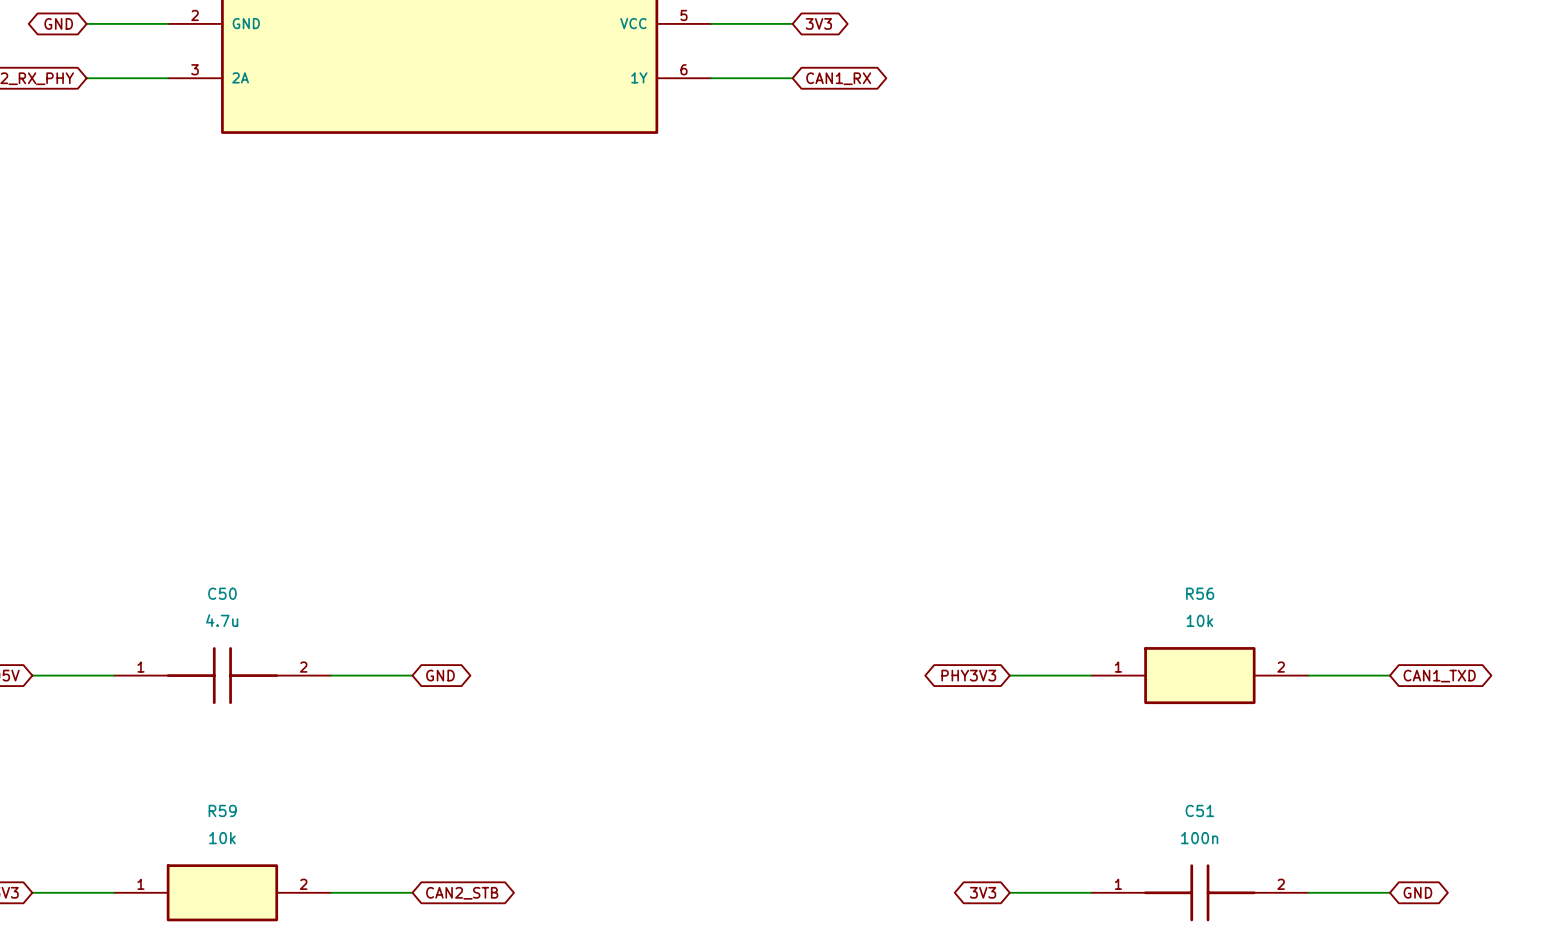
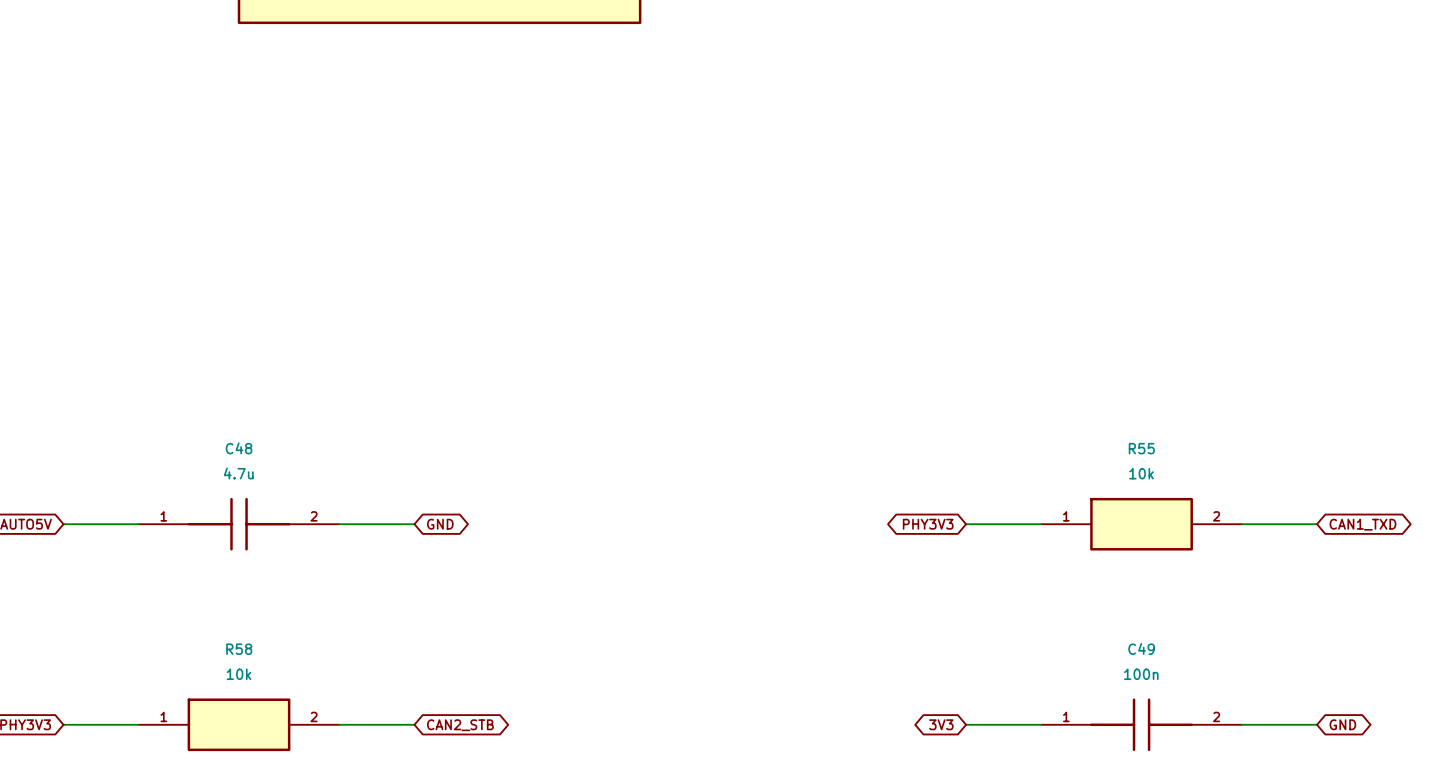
C50 name: C50 (222, 593) -> C48 (239, 448)
R56 name: R56 (1200, 593) -> R55 (1141, 448)
R59 name: R59 (222, 810) -> R58 (239, 649)
C51 name: C51 (1199, 810) -> C49 (1141, 648)

